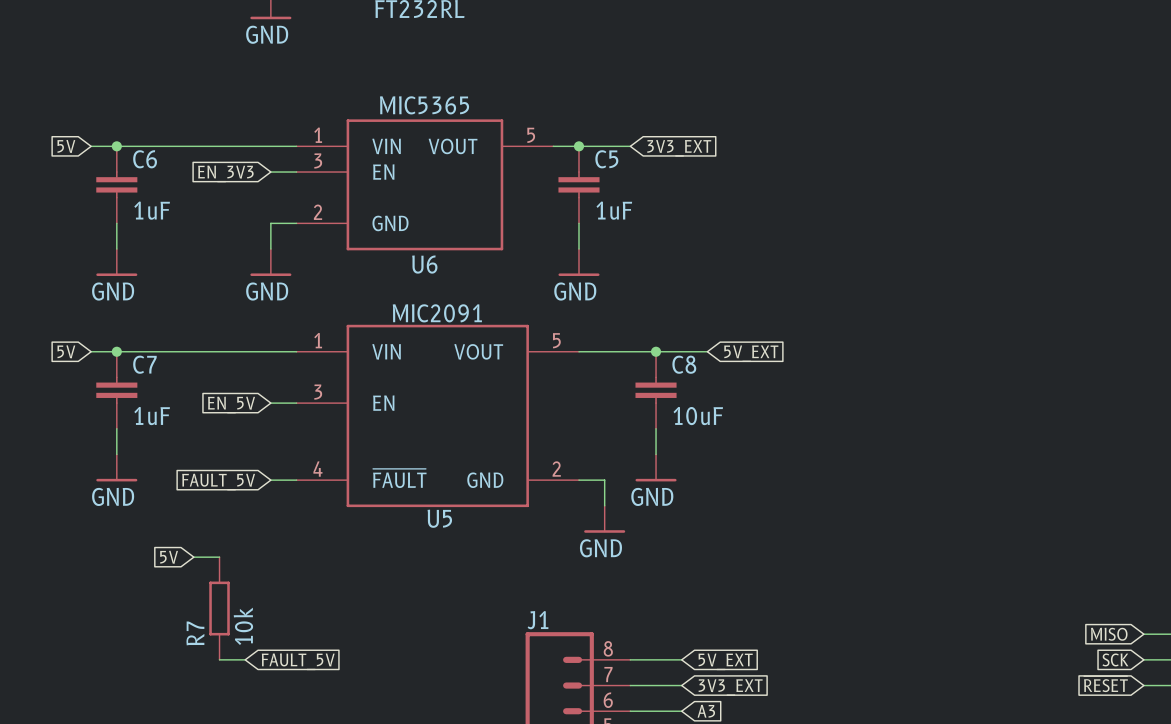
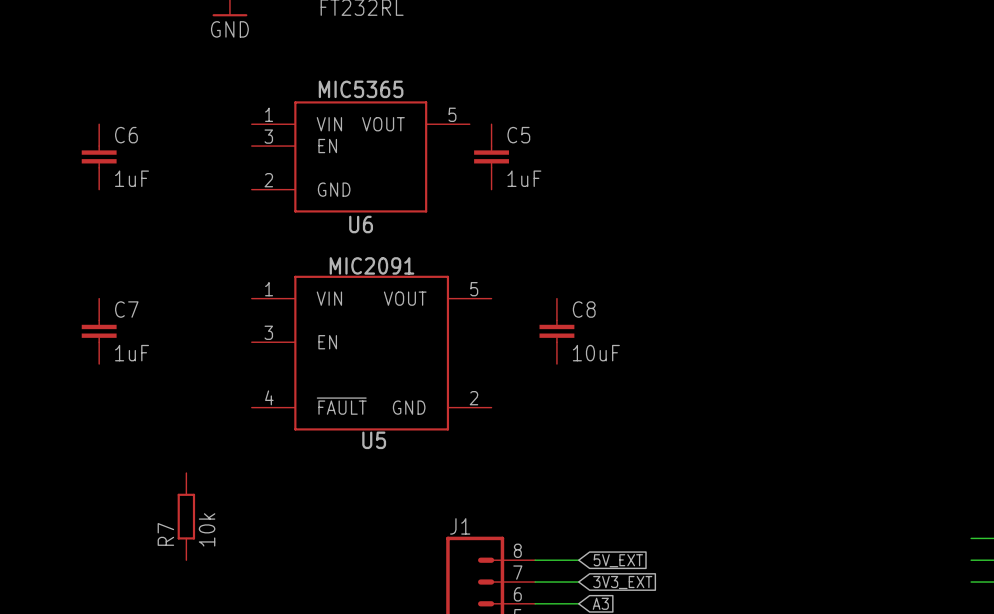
global label: 5V (66, 146) -> none
wire: (91, 146) (296, 146) -> none
junction: (116, 146) -> none
wire: (553, 146) (630, 146) -> none
junction: (578, 146) -> none
global label: 3V3_EXT (679, 148) -> none
wire: (270, 172) (296, 172) -> none
global label: EN_3V3 (225, 173) -> none
wire: (116, 223) (116, 249) -> none
wire: (296, 223) (270, 223) (270, 249) -> none
wire: (578, 223) (578, 249) -> none
power symbol: GND (116, 262) -> none
power symbol: GND (270, 262) -> none
power symbol: GND (578, 262) -> none
global label: 5V (66, 351) -> none
wire: (91, 351) (296, 351) -> none
junction: (116, 351) -> none
wire: (578, 351) (707, 351) -> none
junction: (656, 351) -> none
global label: 5V_EXT (751, 353) -> none
wire: (270, 403) (296, 403) -> none
global label: EN_5V (231, 405) -> none
wire: (116, 428) (116, 454) -> none
wire: (656, 428) (656, 454) -> none
power symbol: GND (116, 467) -> none
power symbol: GND (656, 467) -> none
wire: (270, 480) (296, 480) -> none
wire: (578, 480) (604, 480) (604, 505) -> none
global label: FAULT_5V (218, 482) -> none
power symbol: GND (604, 519) -> none
global label: 5V (169, 557) -> none
wire: (193, 557) (219, 557) -> none
global label: MISO (1109, 634) -> none
wire: (219, 659) (245, 659) -> none
global label: SCK (1115, 659) -> none
global label: FAULT_5V (298, 661) -> none
global label: ~{RESET} (1105, 684) -> none

